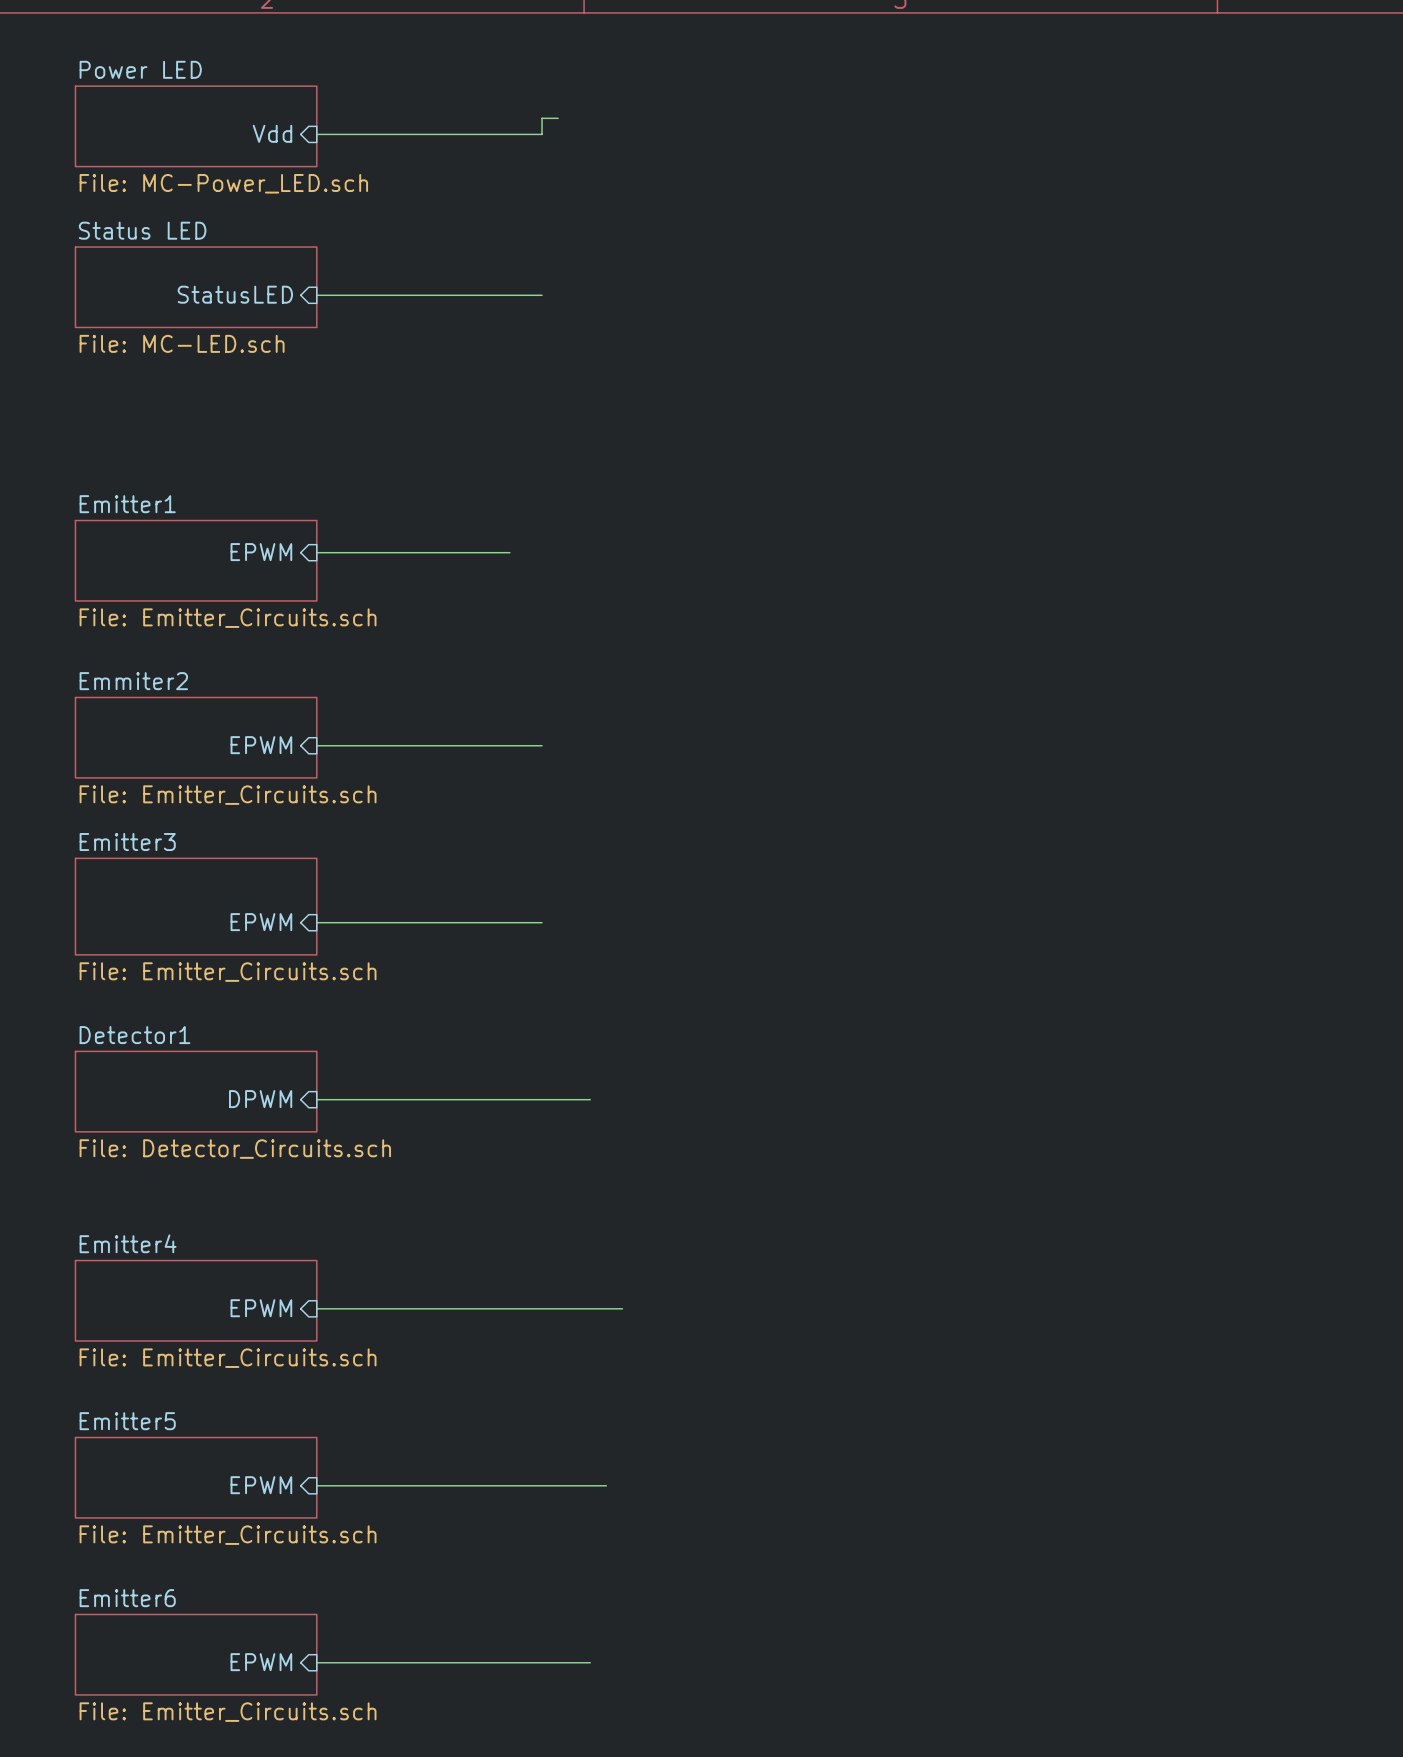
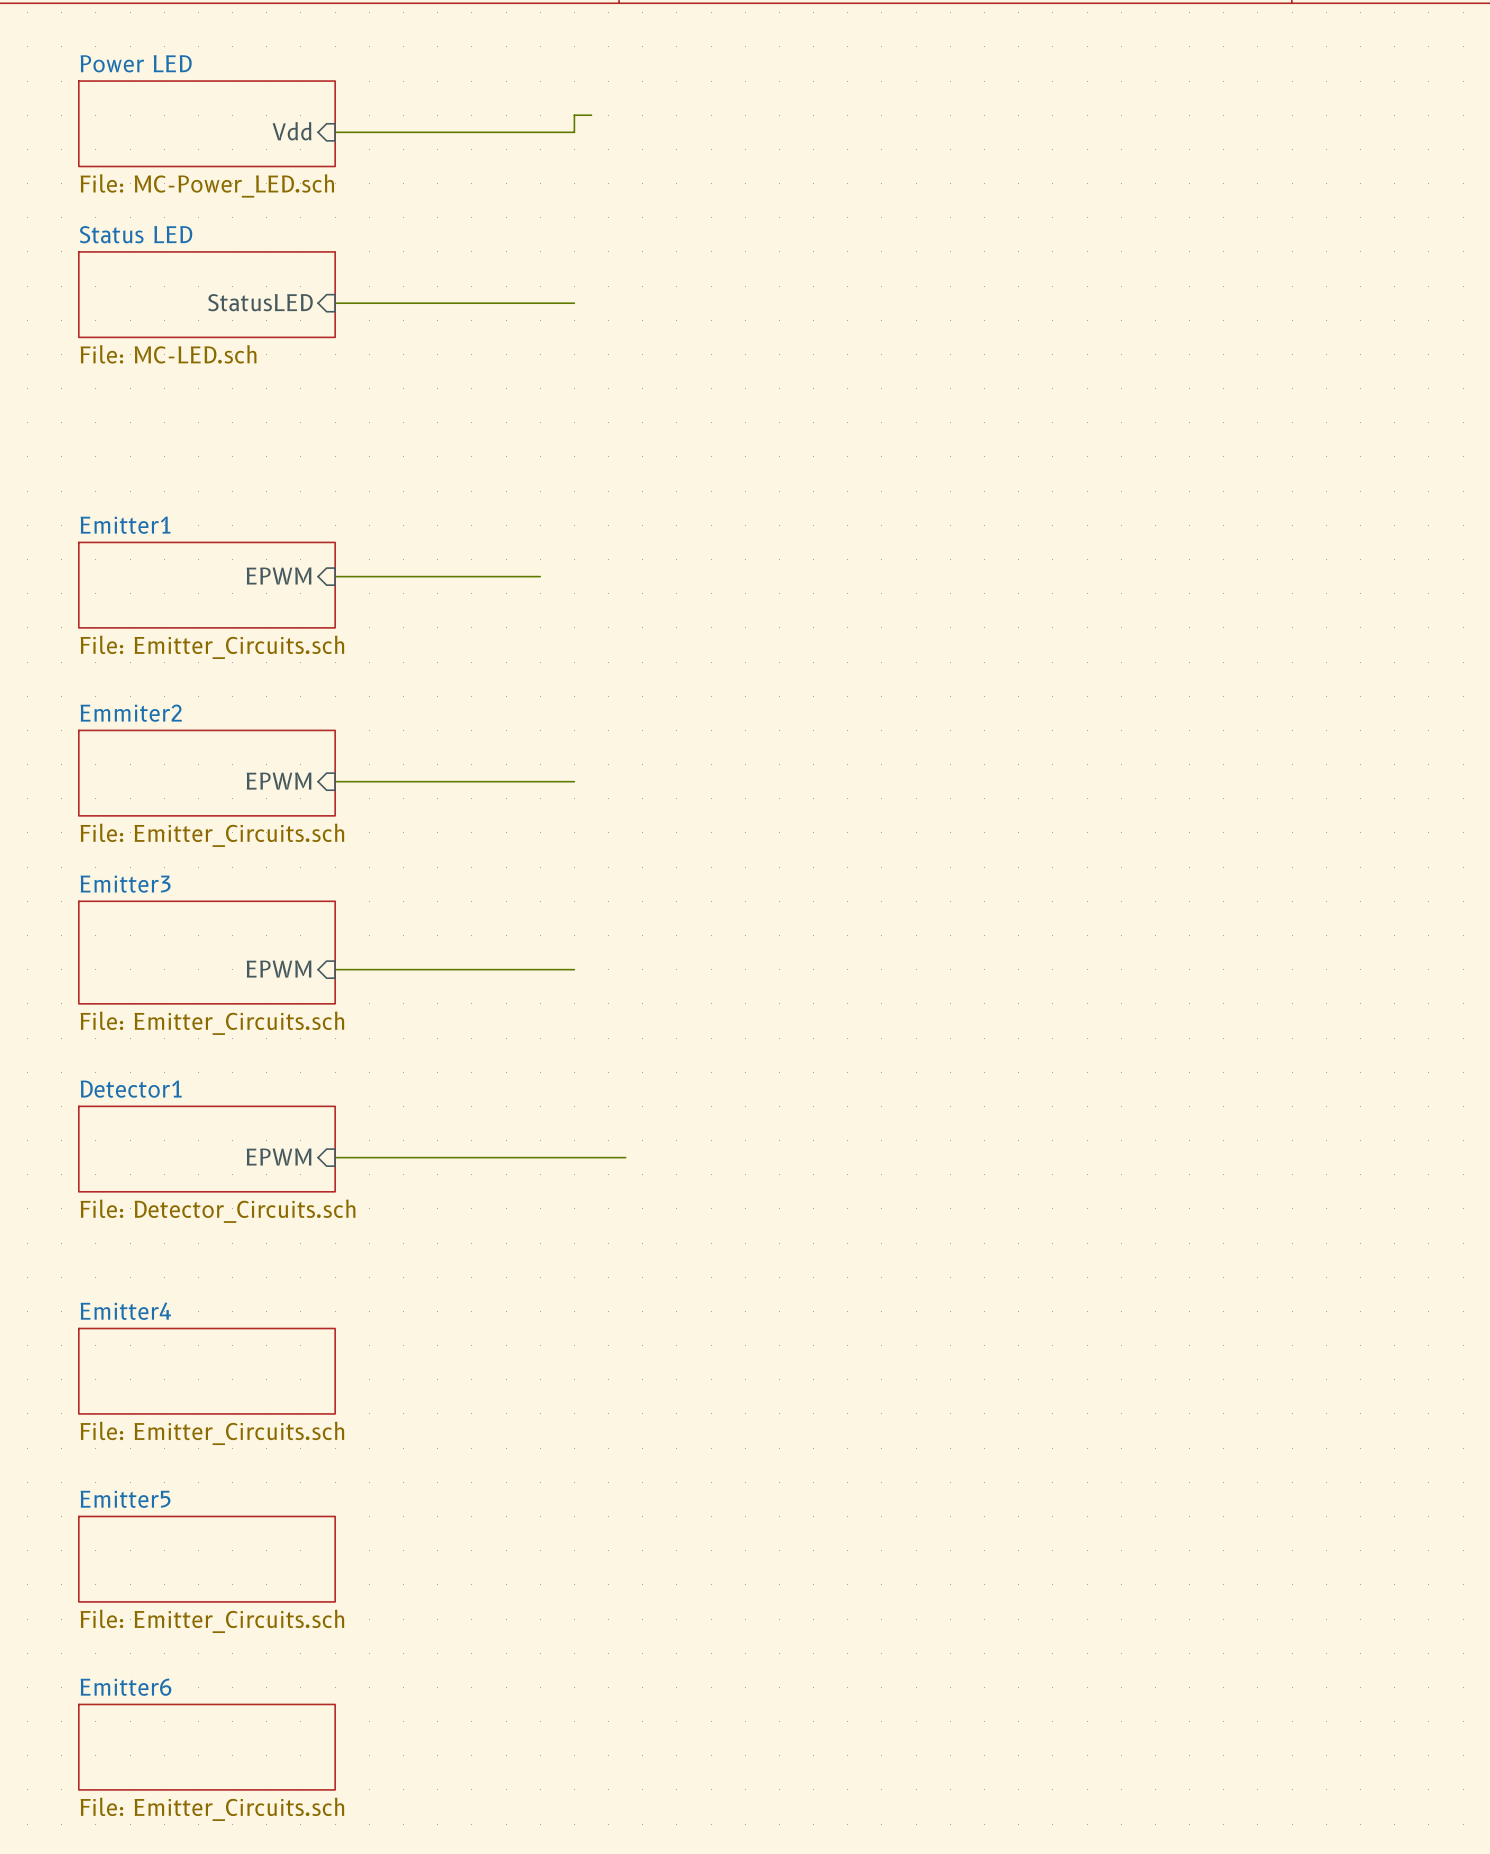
sheet pin: DPWM (260, 1099) -> EPWM (278, 1156)
sheet pin: EPWM (261, 1308) -> none
wire: (316, 1308) (622, 1308) -> none
sheet pin: EPWM (261, 1485) -> none
wire: (316, 1485) (606, 1485) -> none
sheet pin: EPWM (261, 1662) -> none
wire: (316, 1662) (590, 1662) -> none

